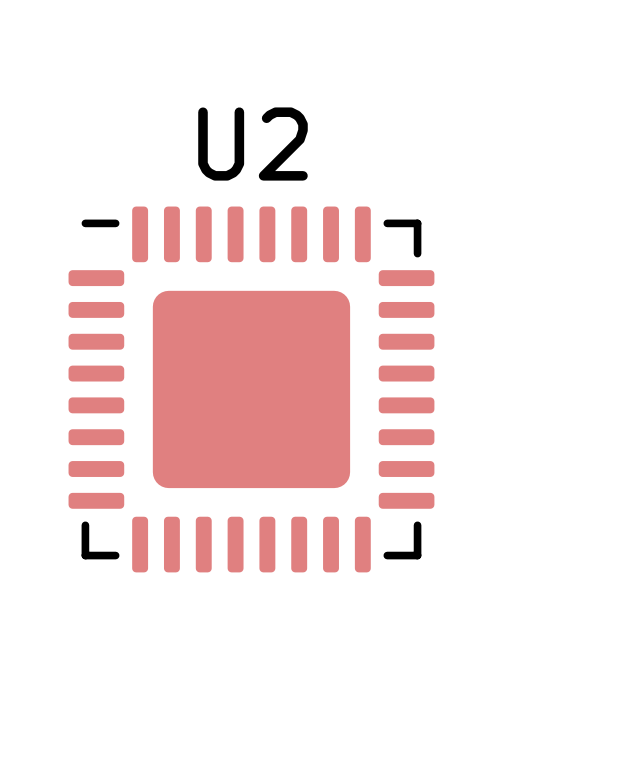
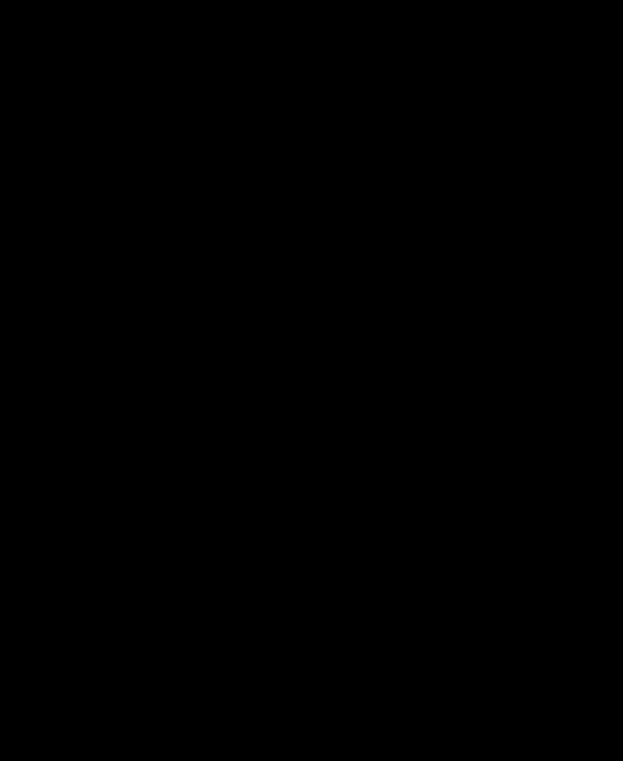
U2: (251, 389) -> none

